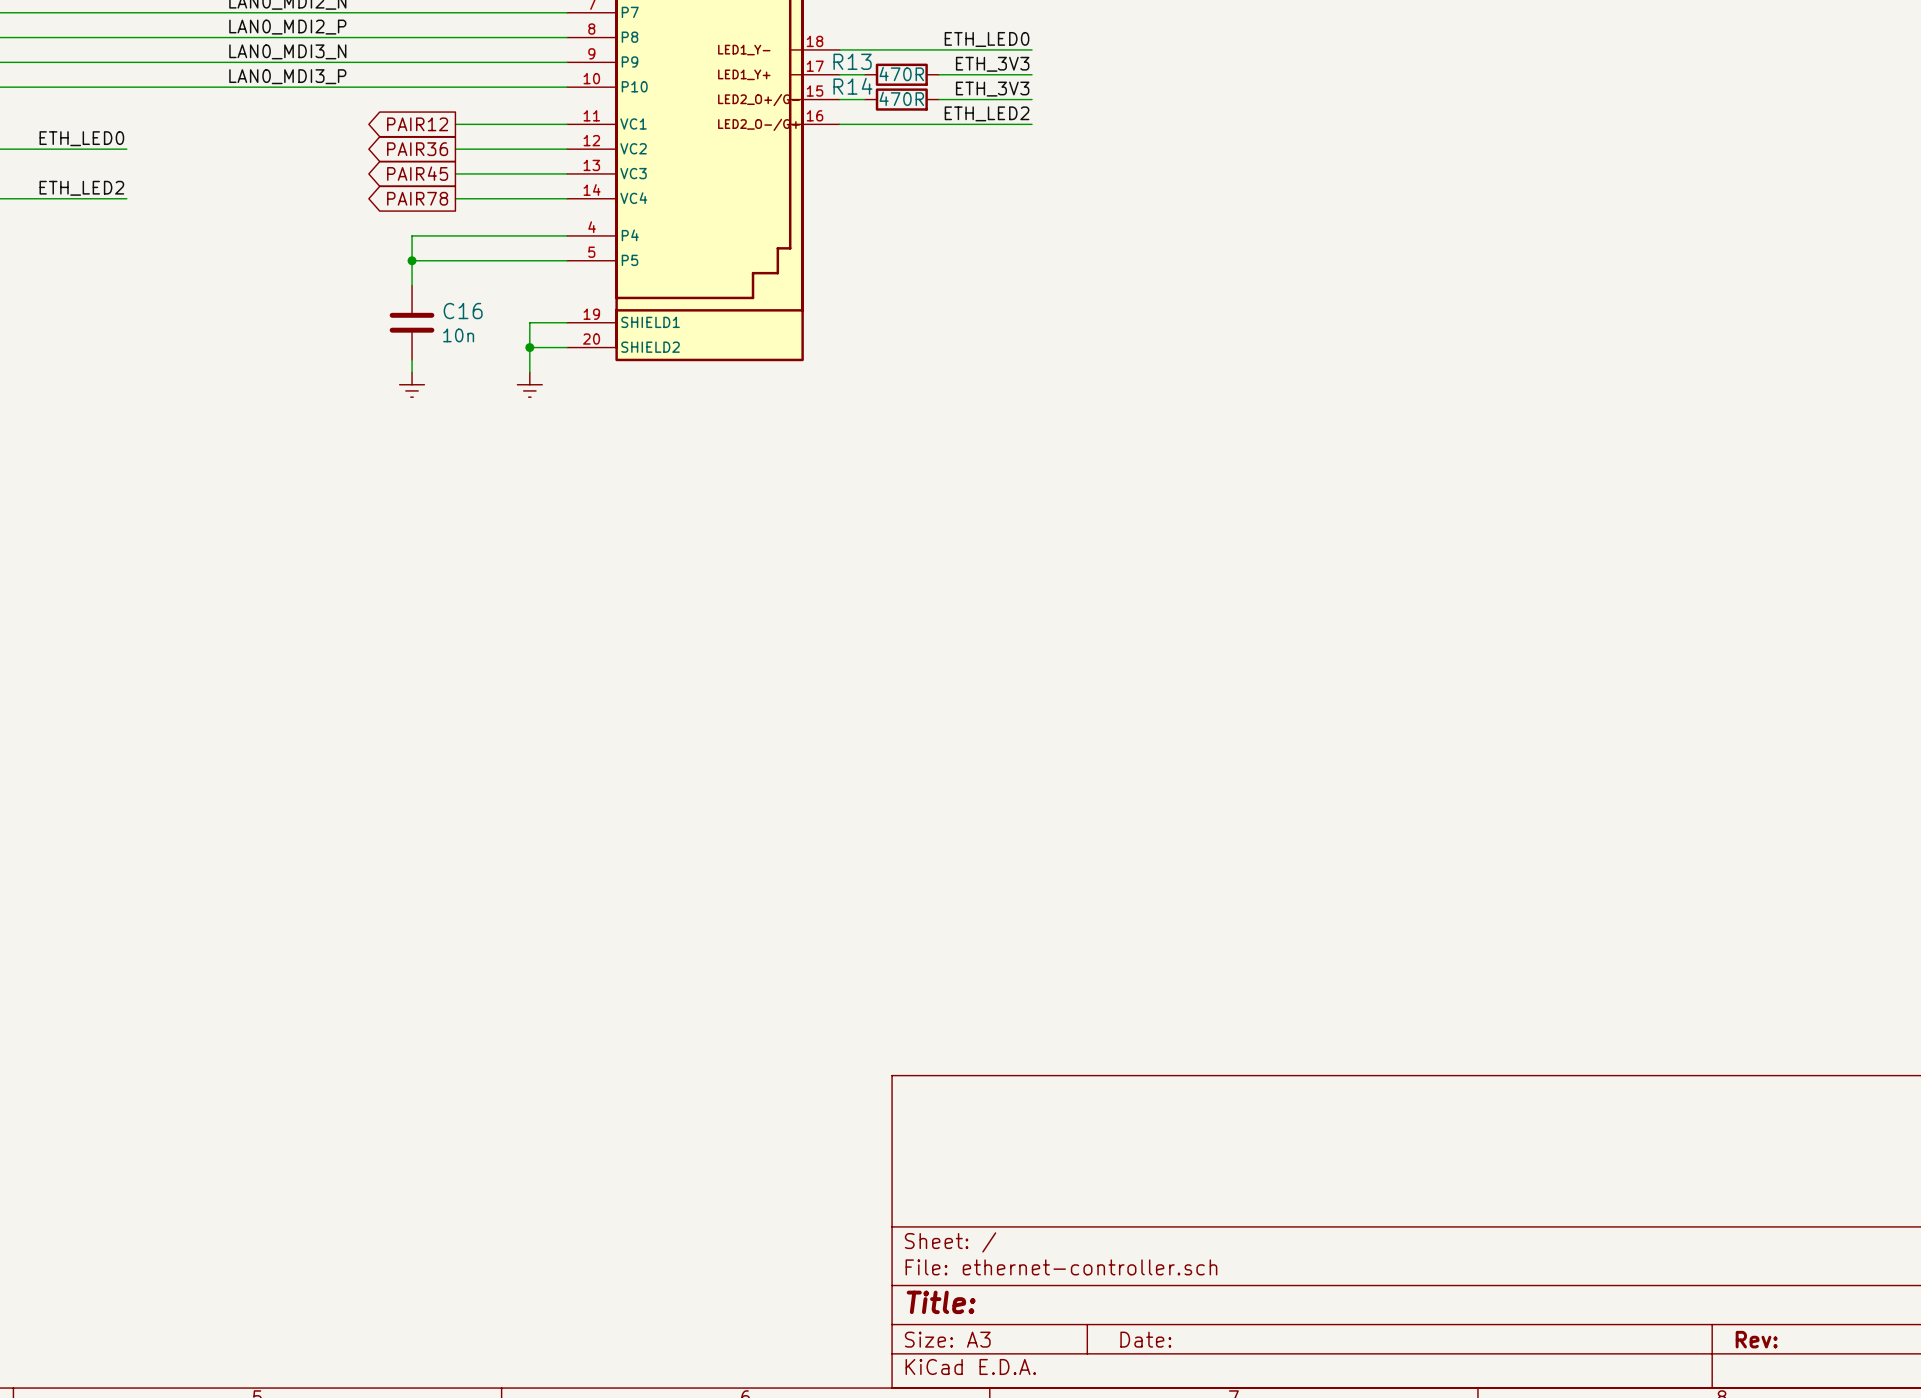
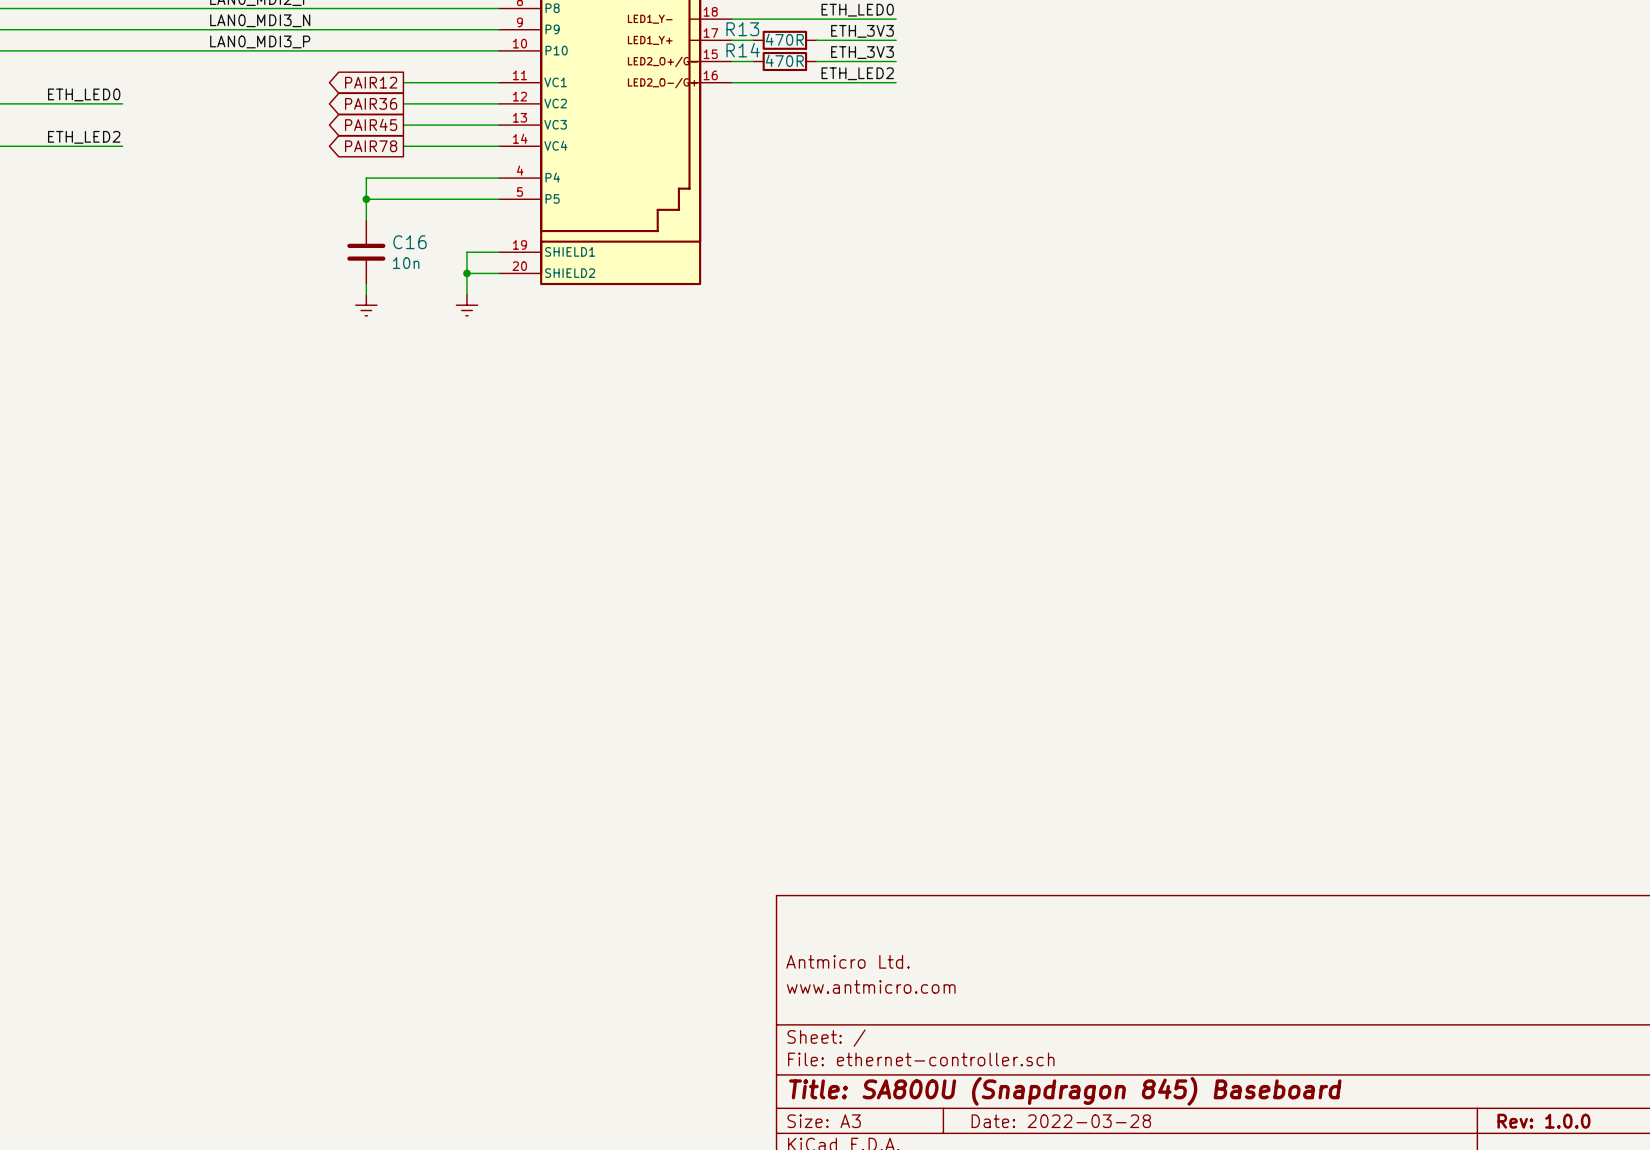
title block: none -> Antmicro Ltd. (847, 961)
title block: none -> www.antmicro.com (871, 986)
title block: Title: (941, 1302) -> Title: SA800U (Snapdragon 845) Baseboard (1065, 1091)
title block: Date: (1145, 1339) -> Date: 2022-03-28 (1061, 1121)
title block: Rev: (1756, 1339) -> Rev: 1.0.0 (1543, 1121)

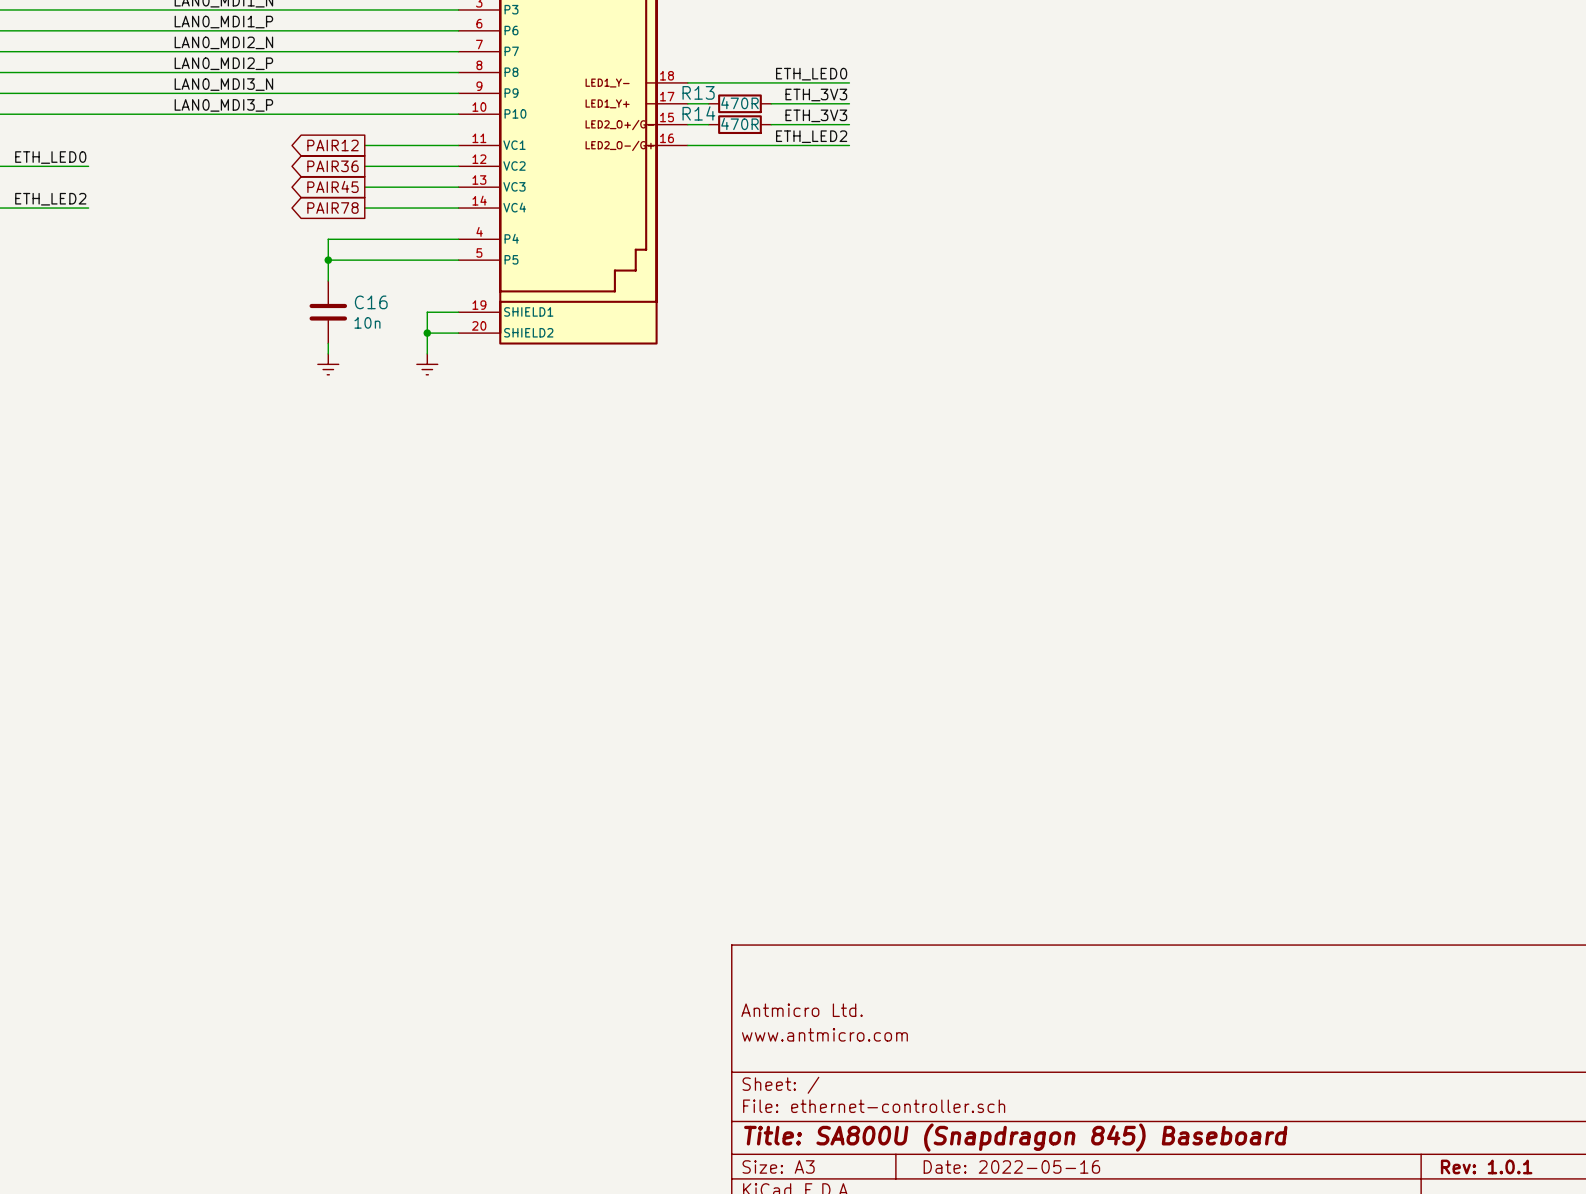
title block: Date: 2022-03-28 (1061, 1121) -> Date: 2022-05-16 (1011, 1166)
title block: Rev: 1.0.0 (1543, 1121) -> Rev: 1.0.1 (1486, 1166)

